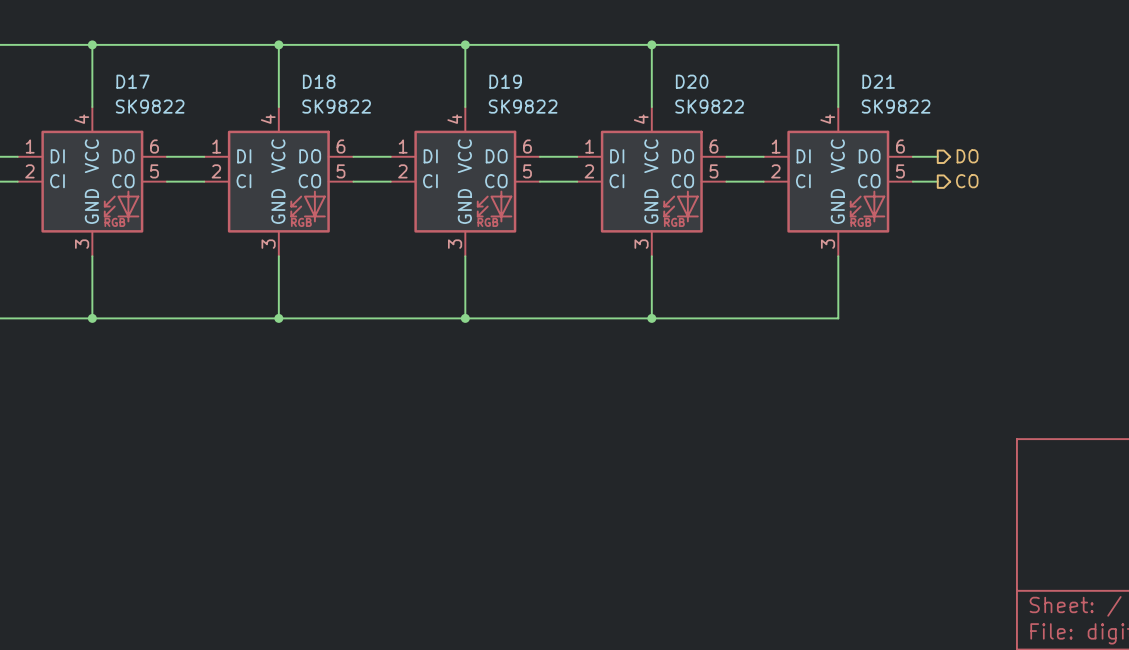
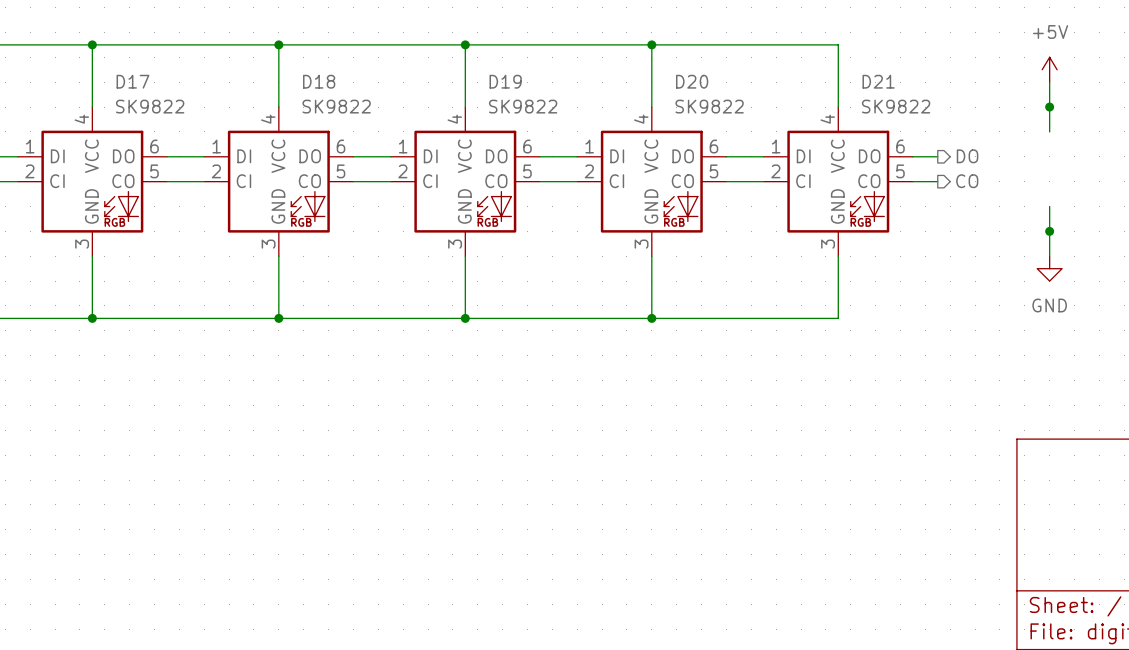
power symbol: none -> +5V (1049, 69)
wire: none -> (1049, 82) (1049, 131)
junction: none -> (1049, 107)
wire: none -> (1049, 206) (1049, 256)
junction: none -> (1049, 231)
power symbol: none -> GND (1049, 268)

